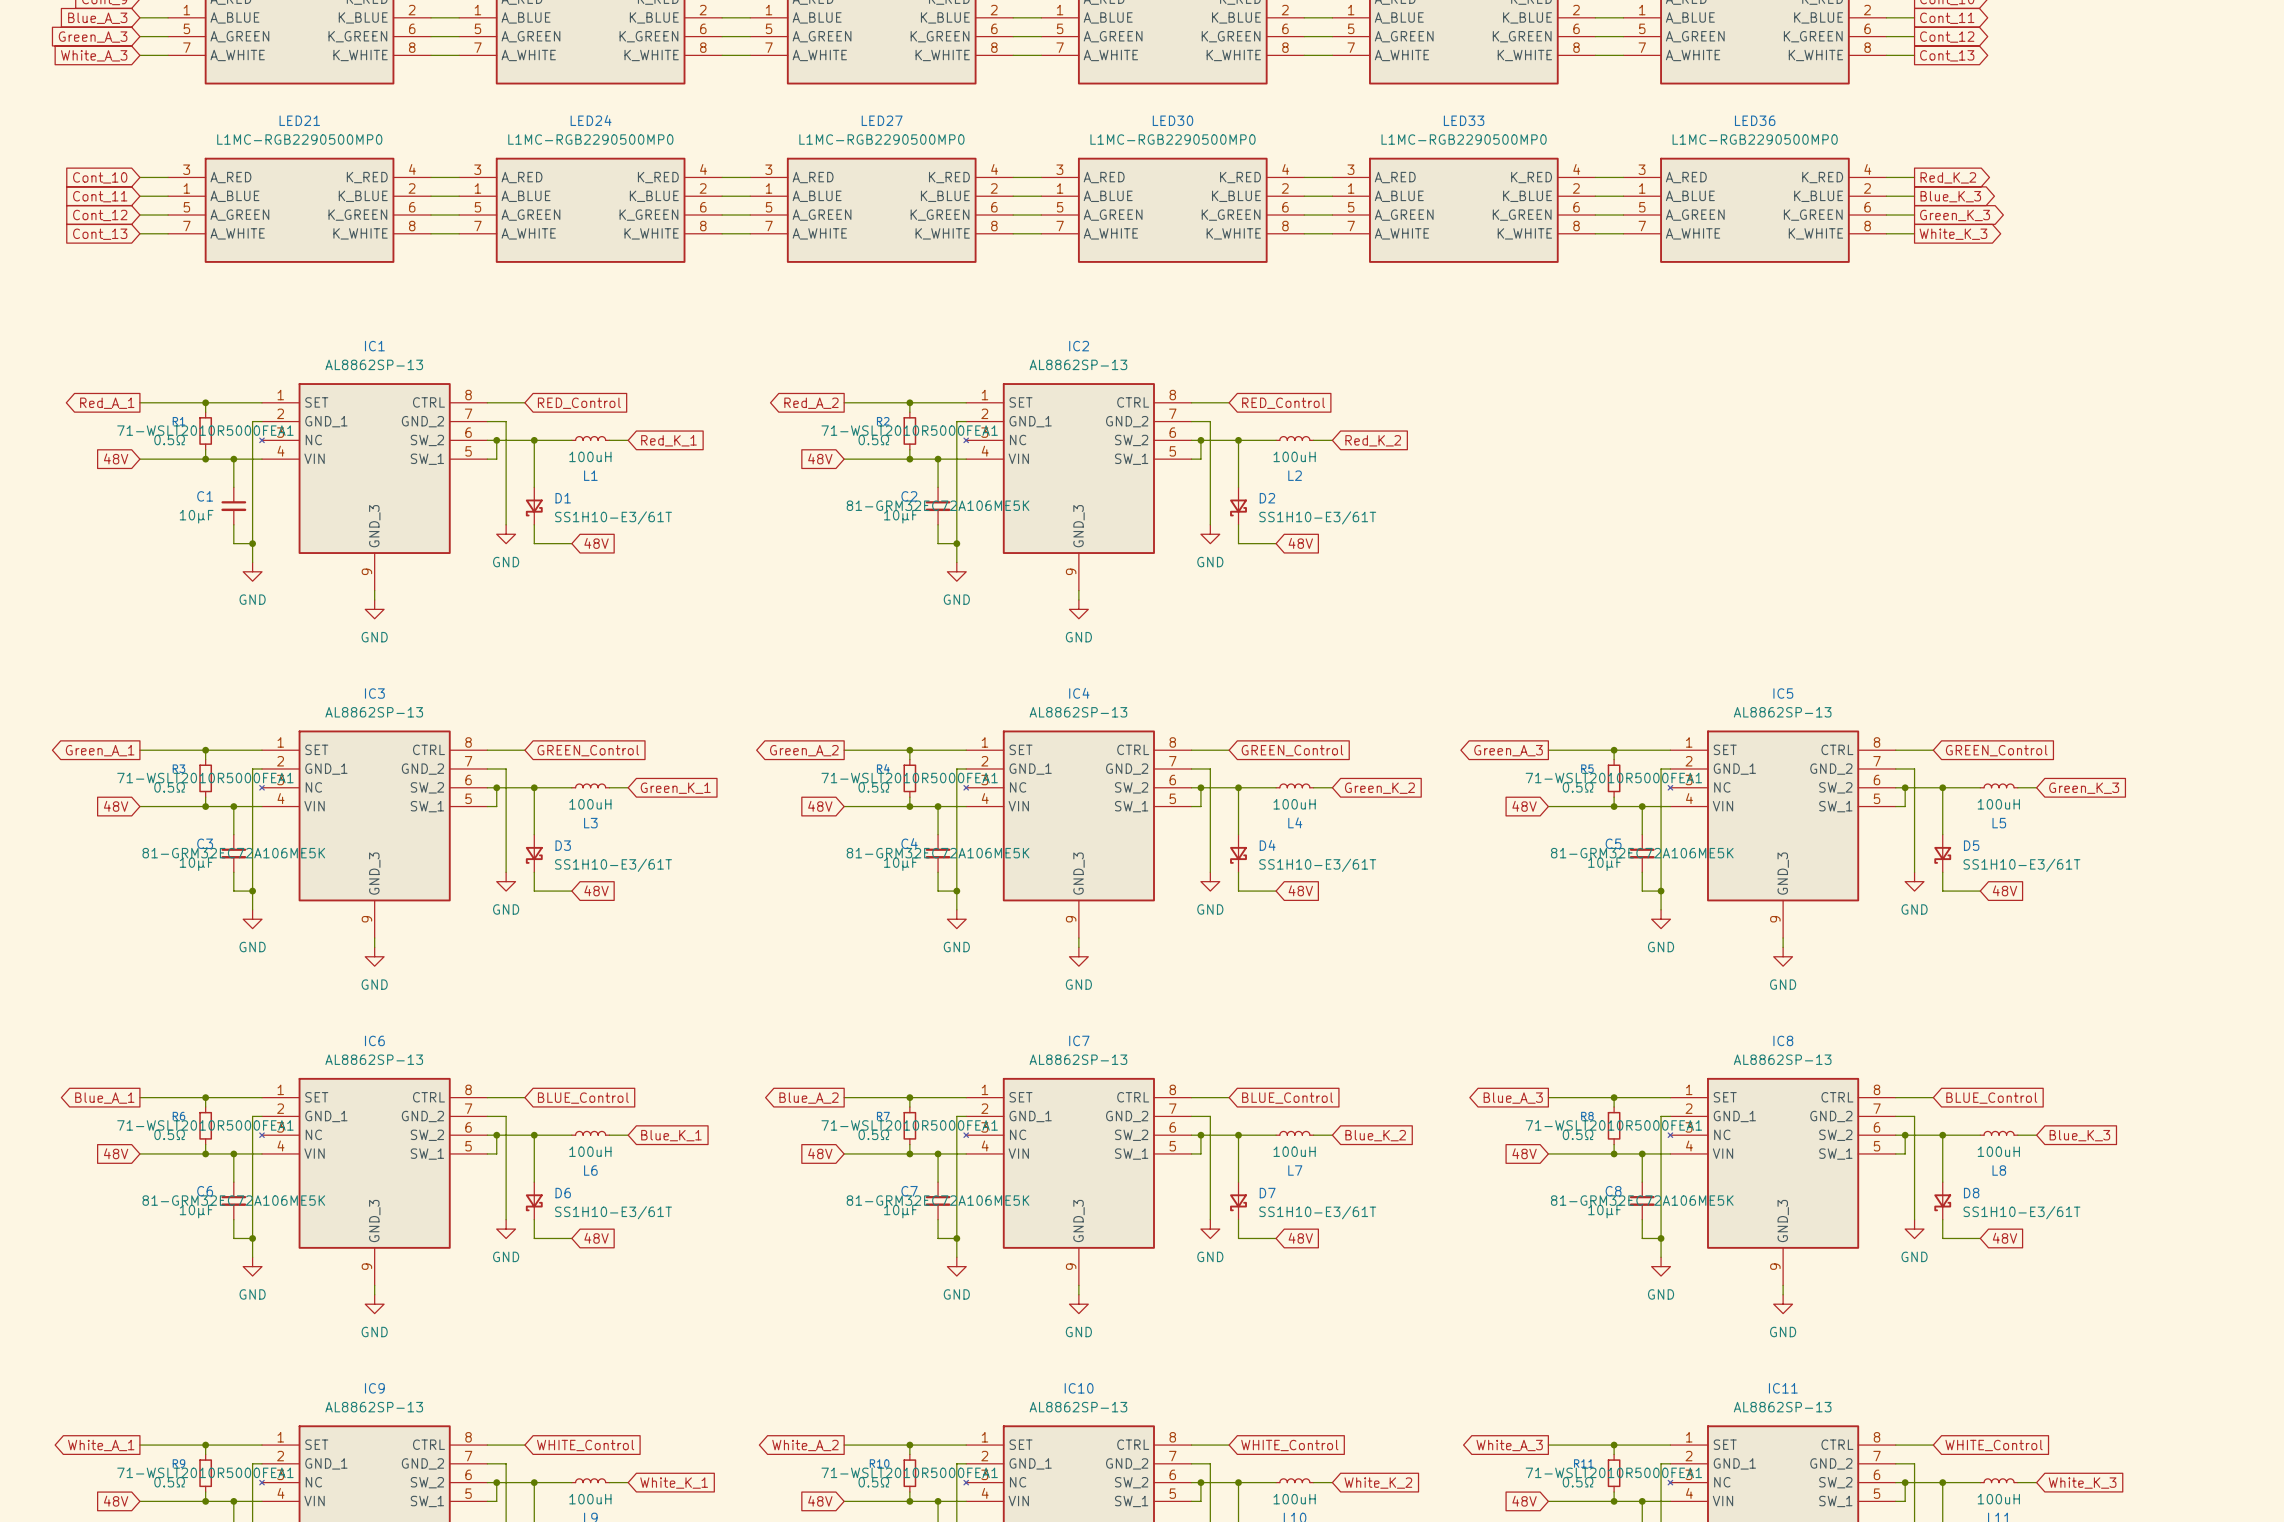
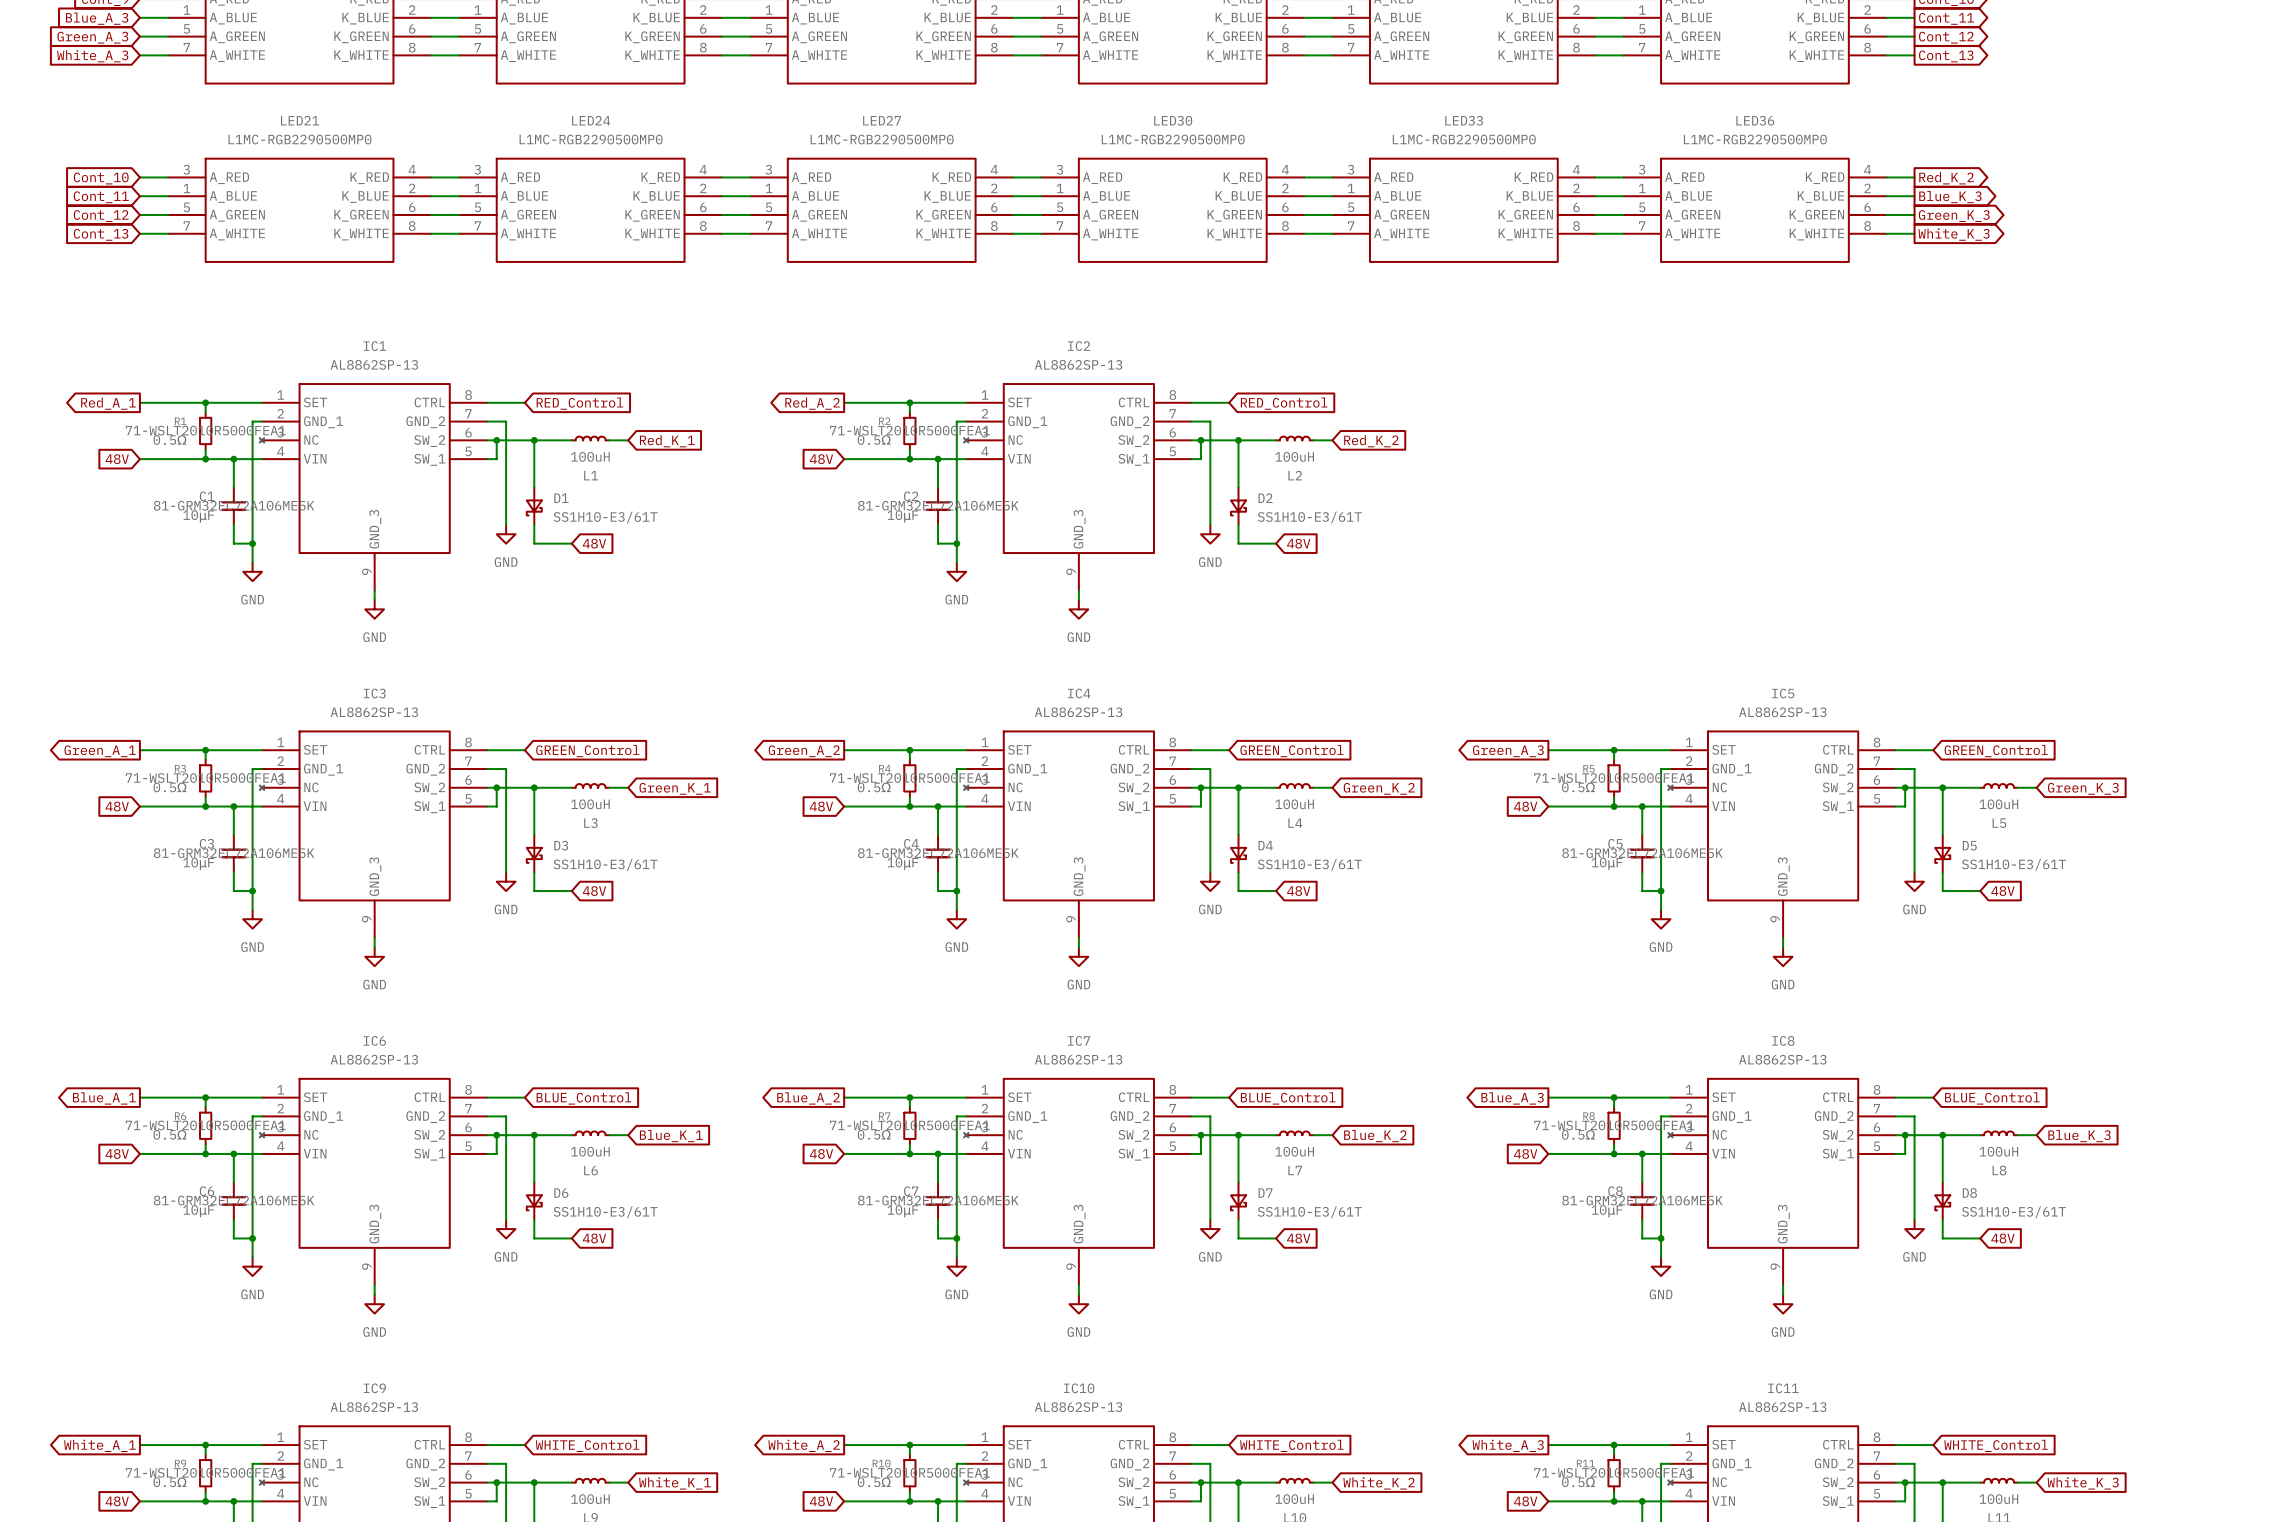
C1 text: none -> 81-GRM32EC72A106ME5K (234, 505)

